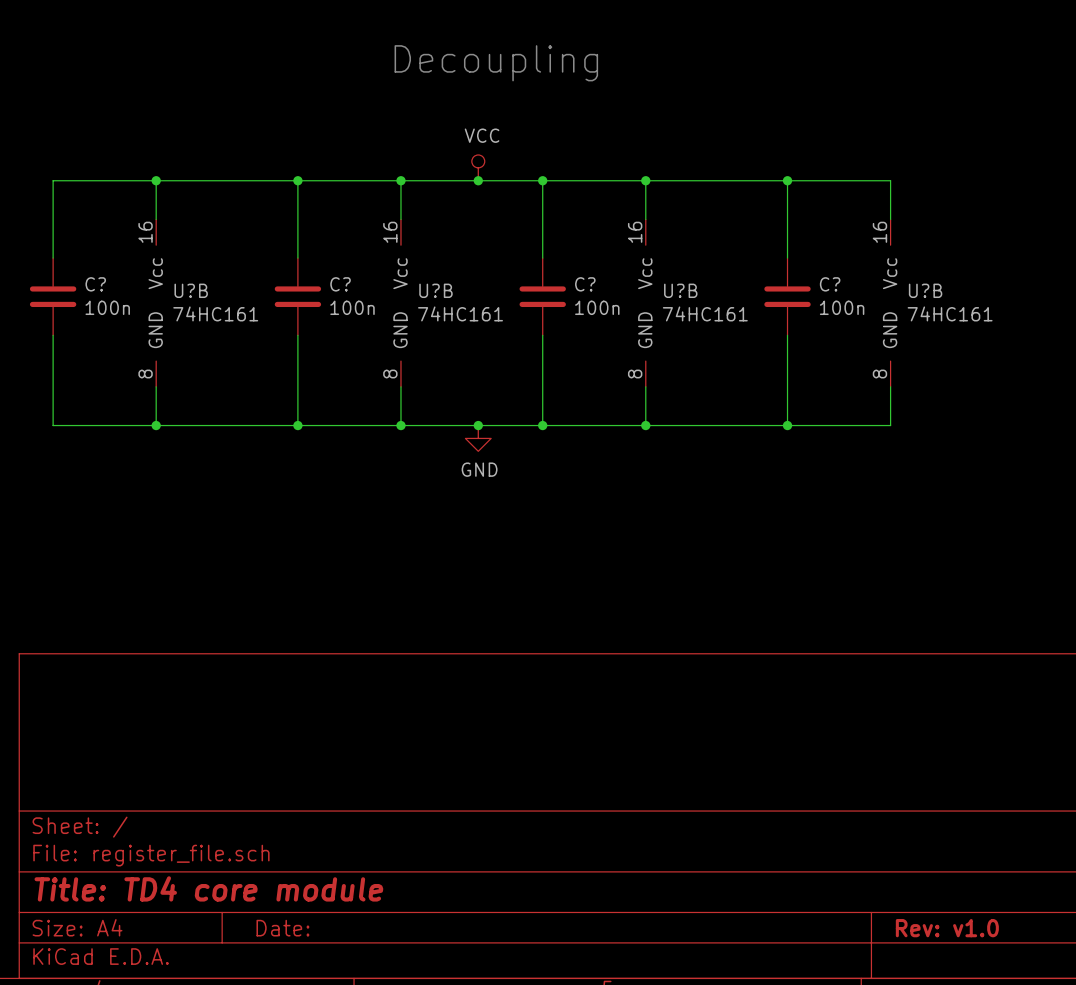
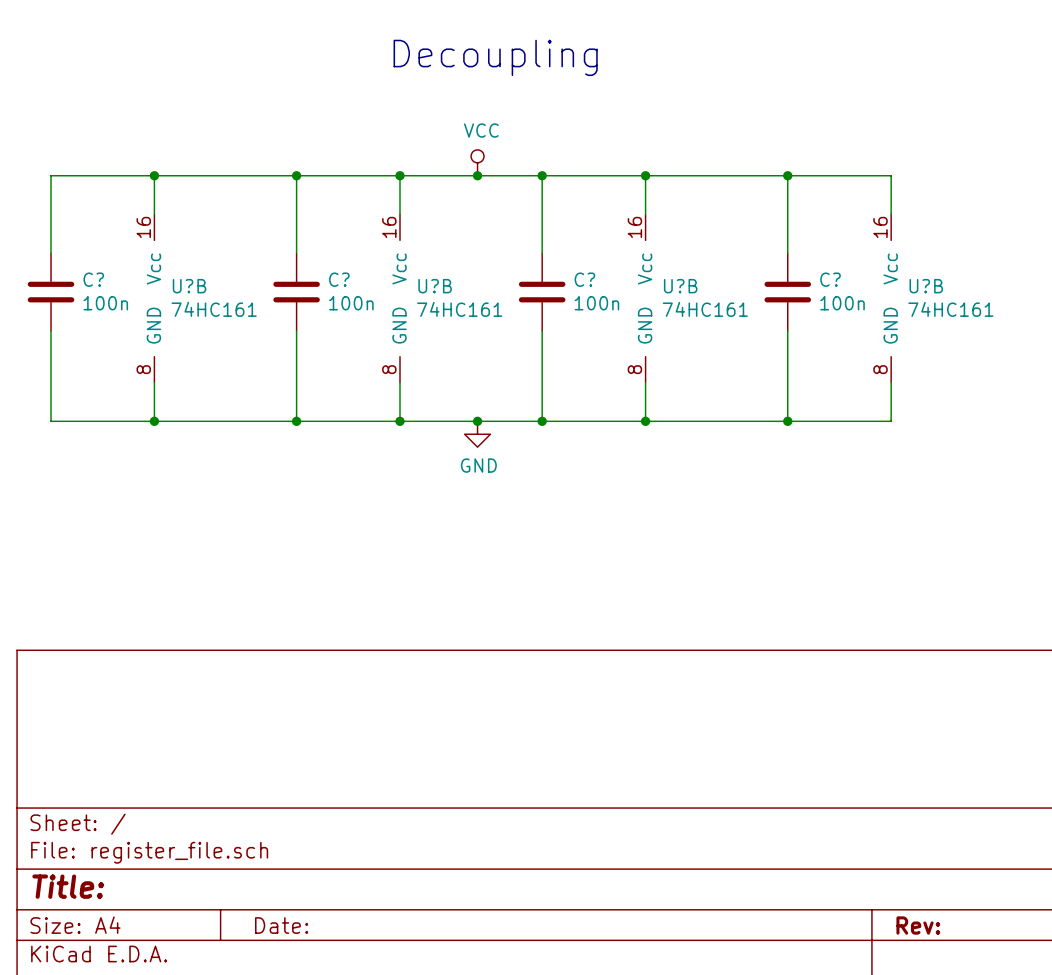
title block: Title: TD4 core module (208, 888) -> Title: (68, 886)
title block: Rev: v1.0 (947, 928) -> Rev: (918, 925)

